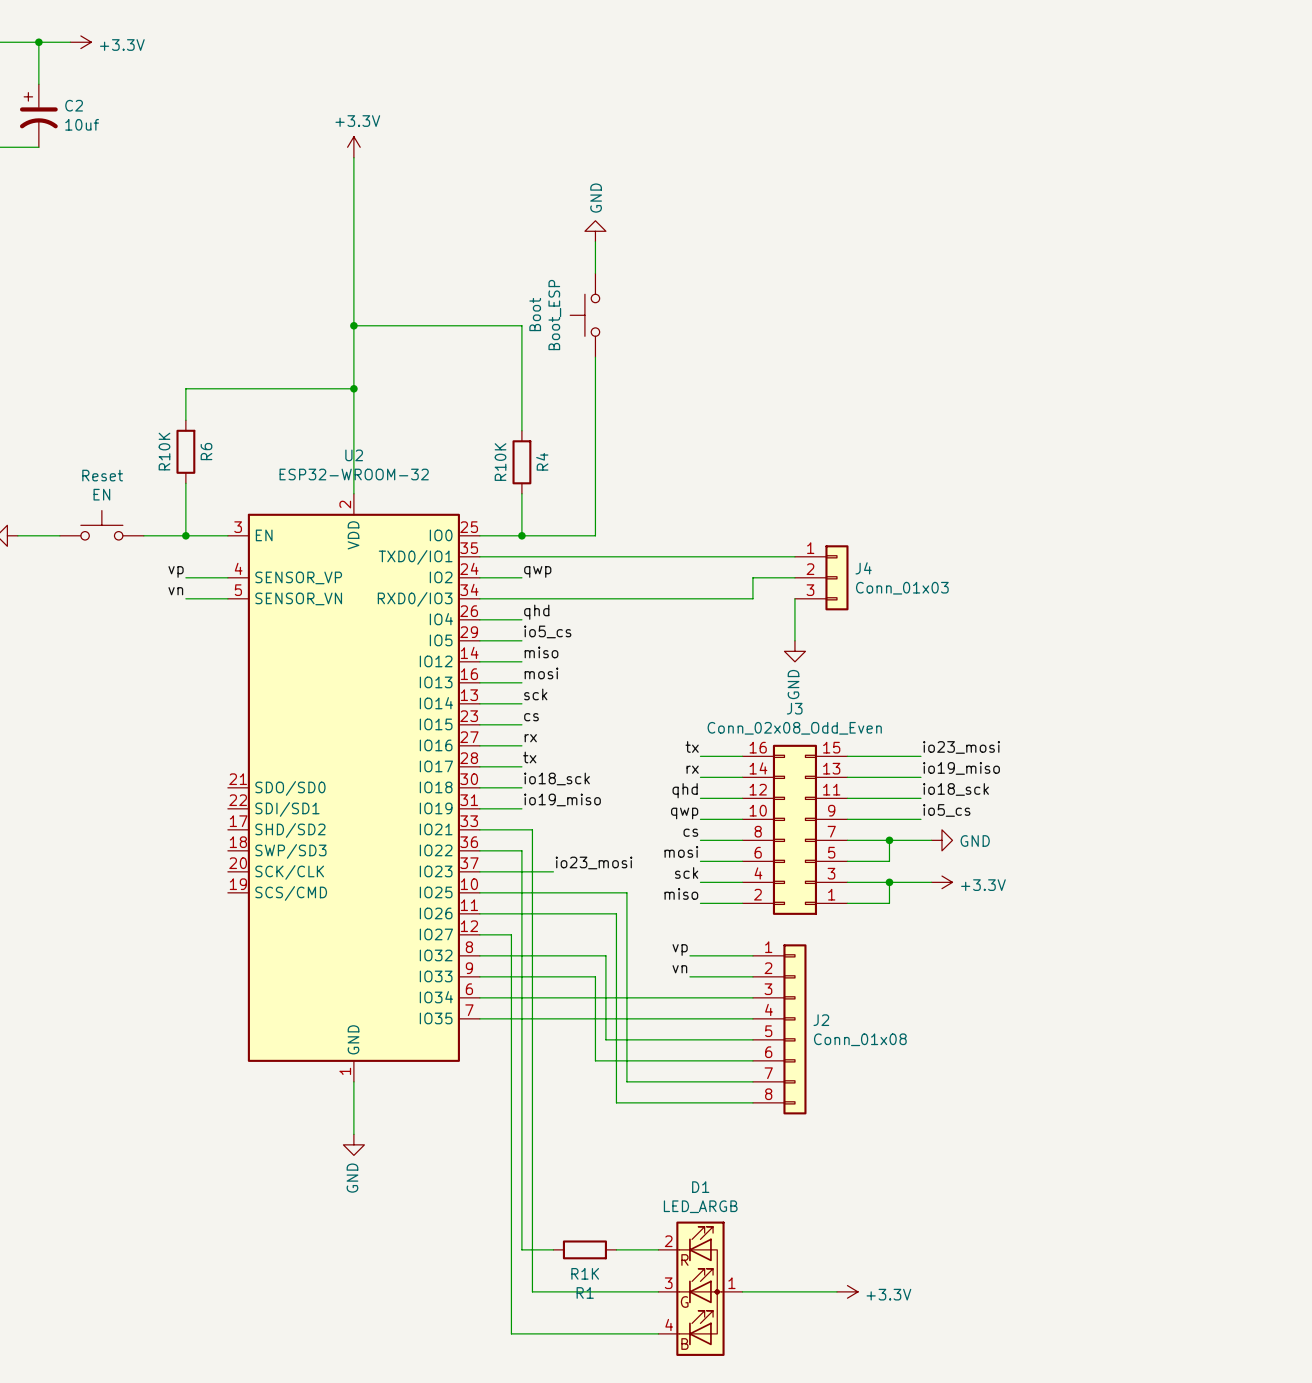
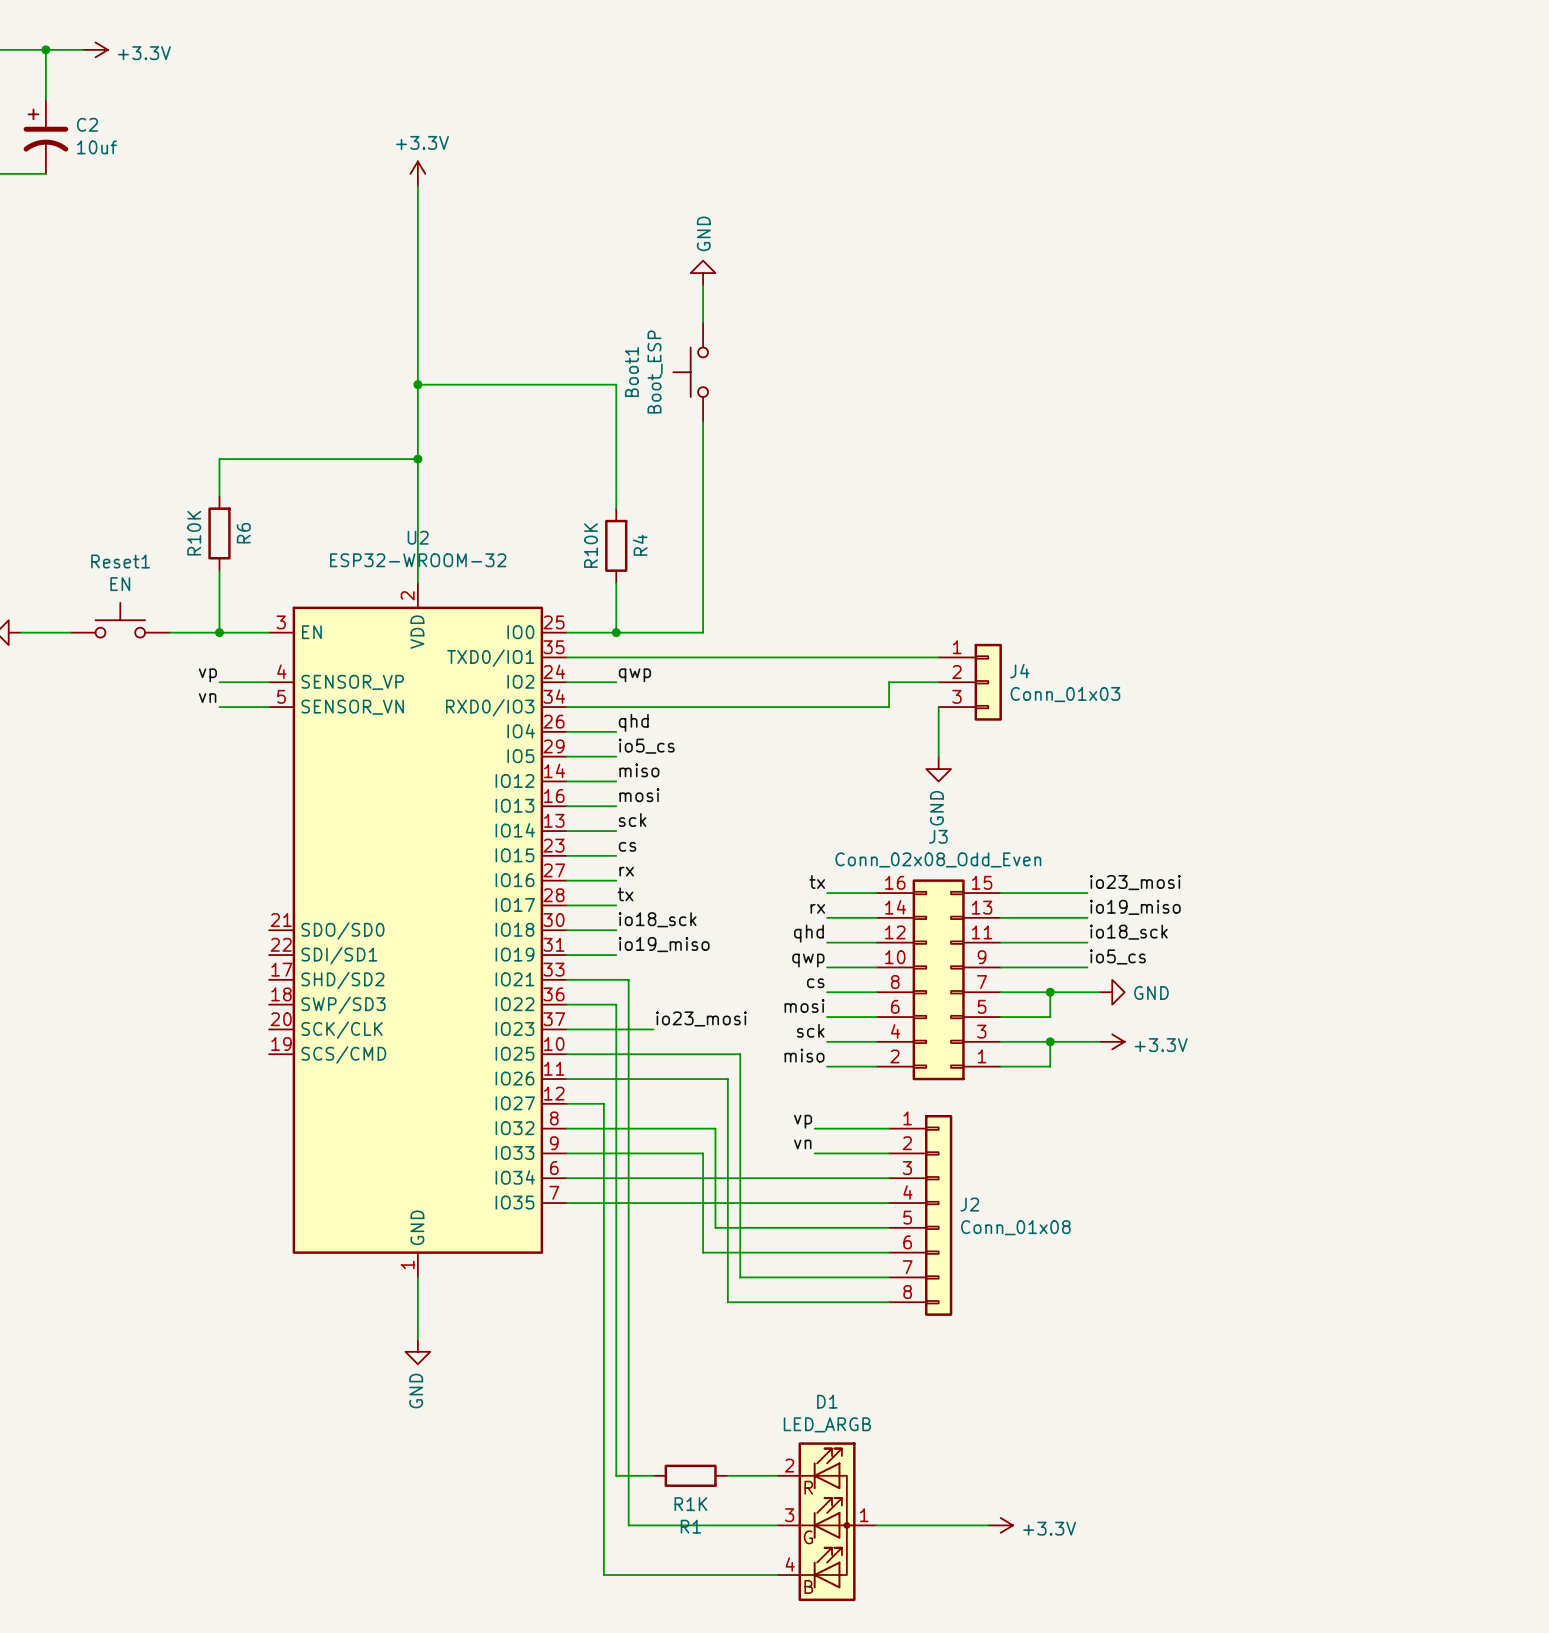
Boot name: Boot (535, 314) -> Boot1 (631, 371)
Reset name: Reset (102, 475) -> Reset1 (120, 561)

